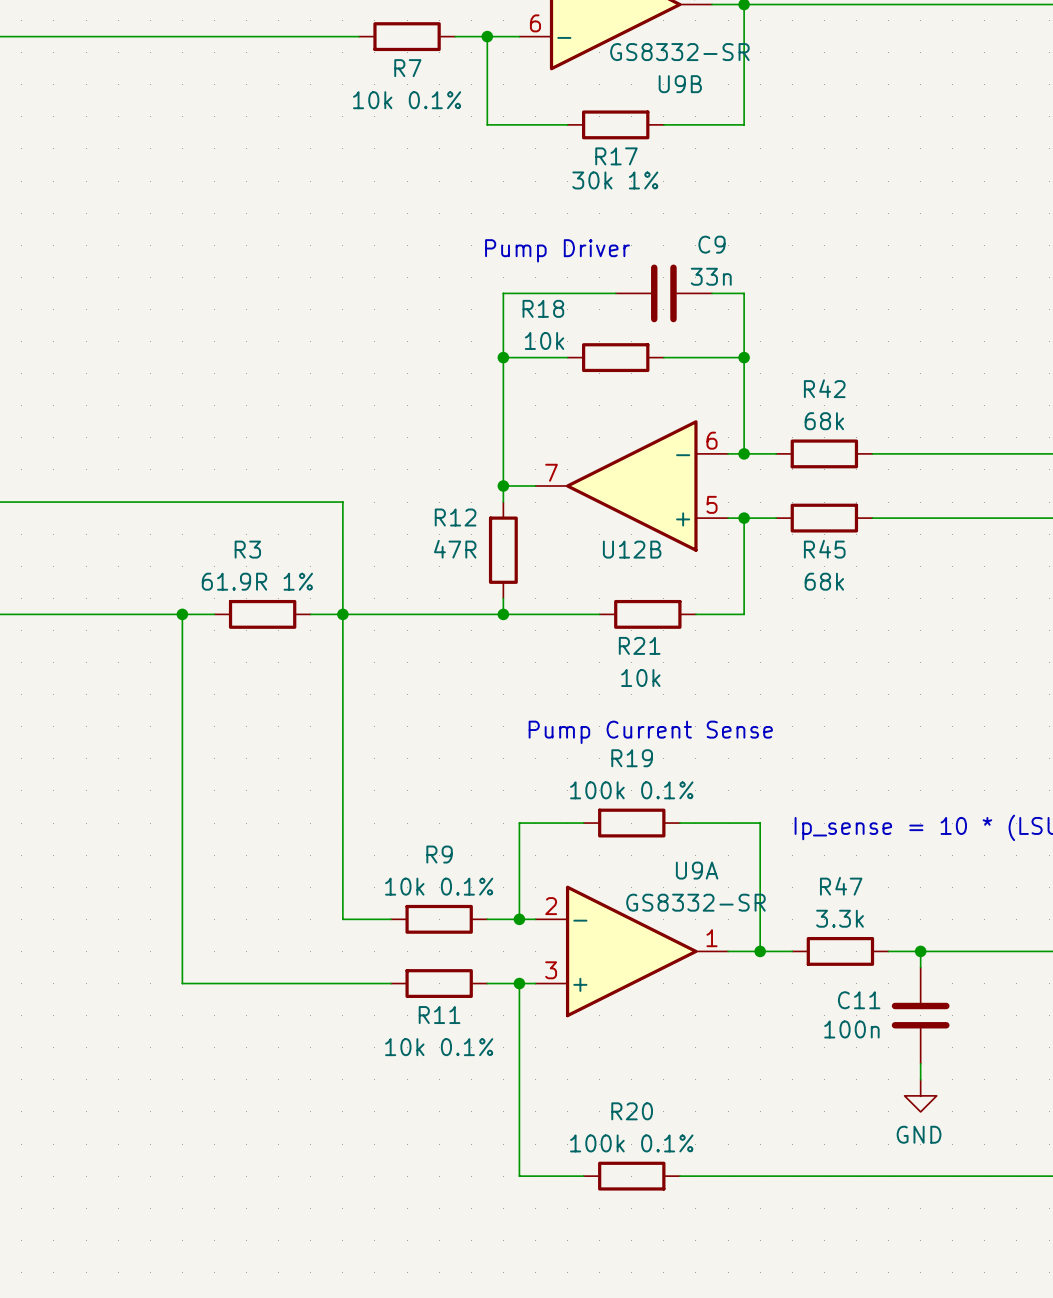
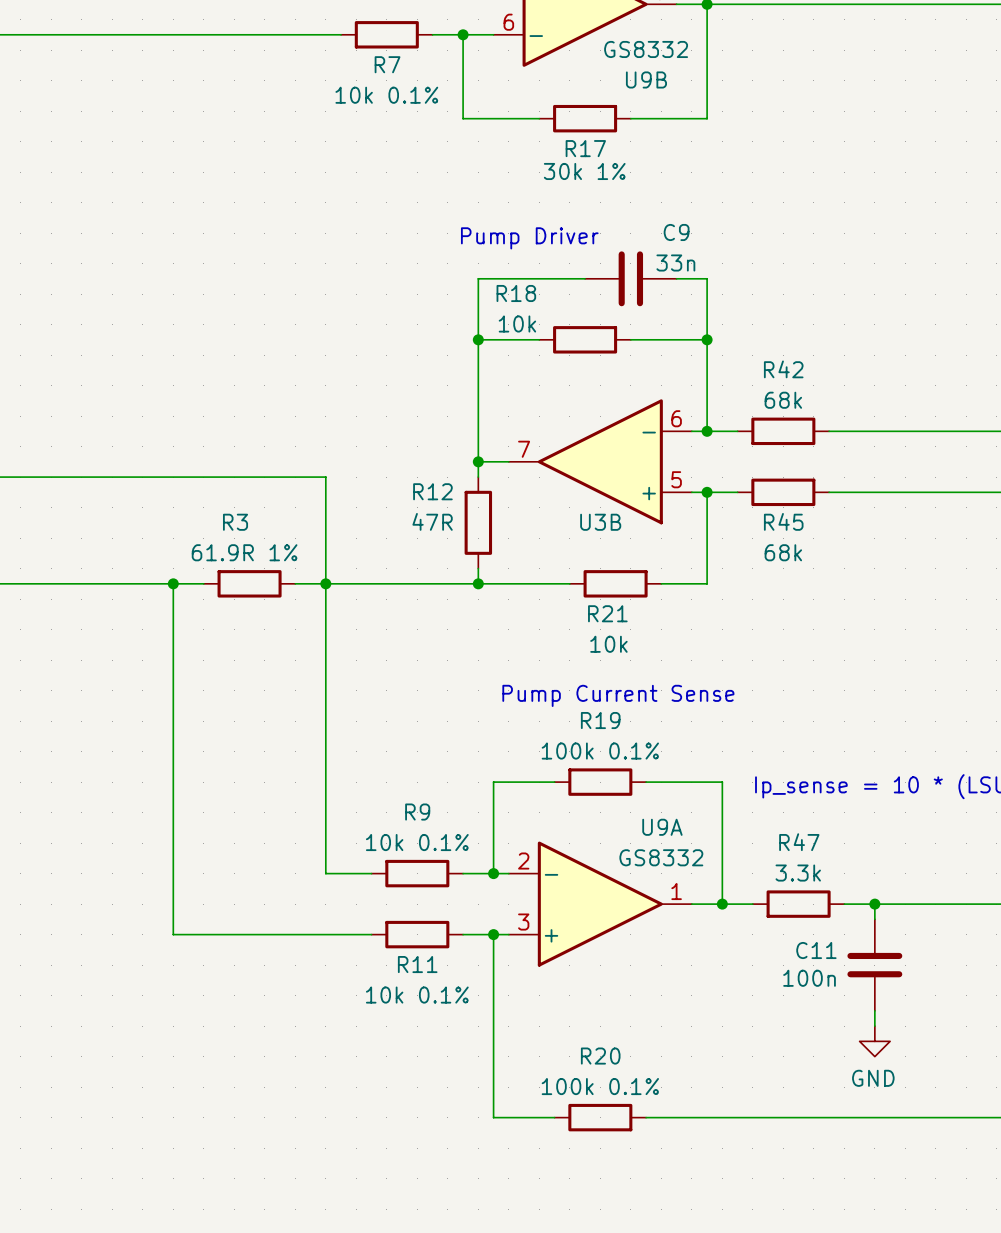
U9B value: GS8332-SR (679, 52) -> GS8332 (646, 49)
U12B name: U12B (632, 549) -> U3B (600, 522)
U9A value: GS8332-SR (695, 902) -> GS8332 (661, 857)

